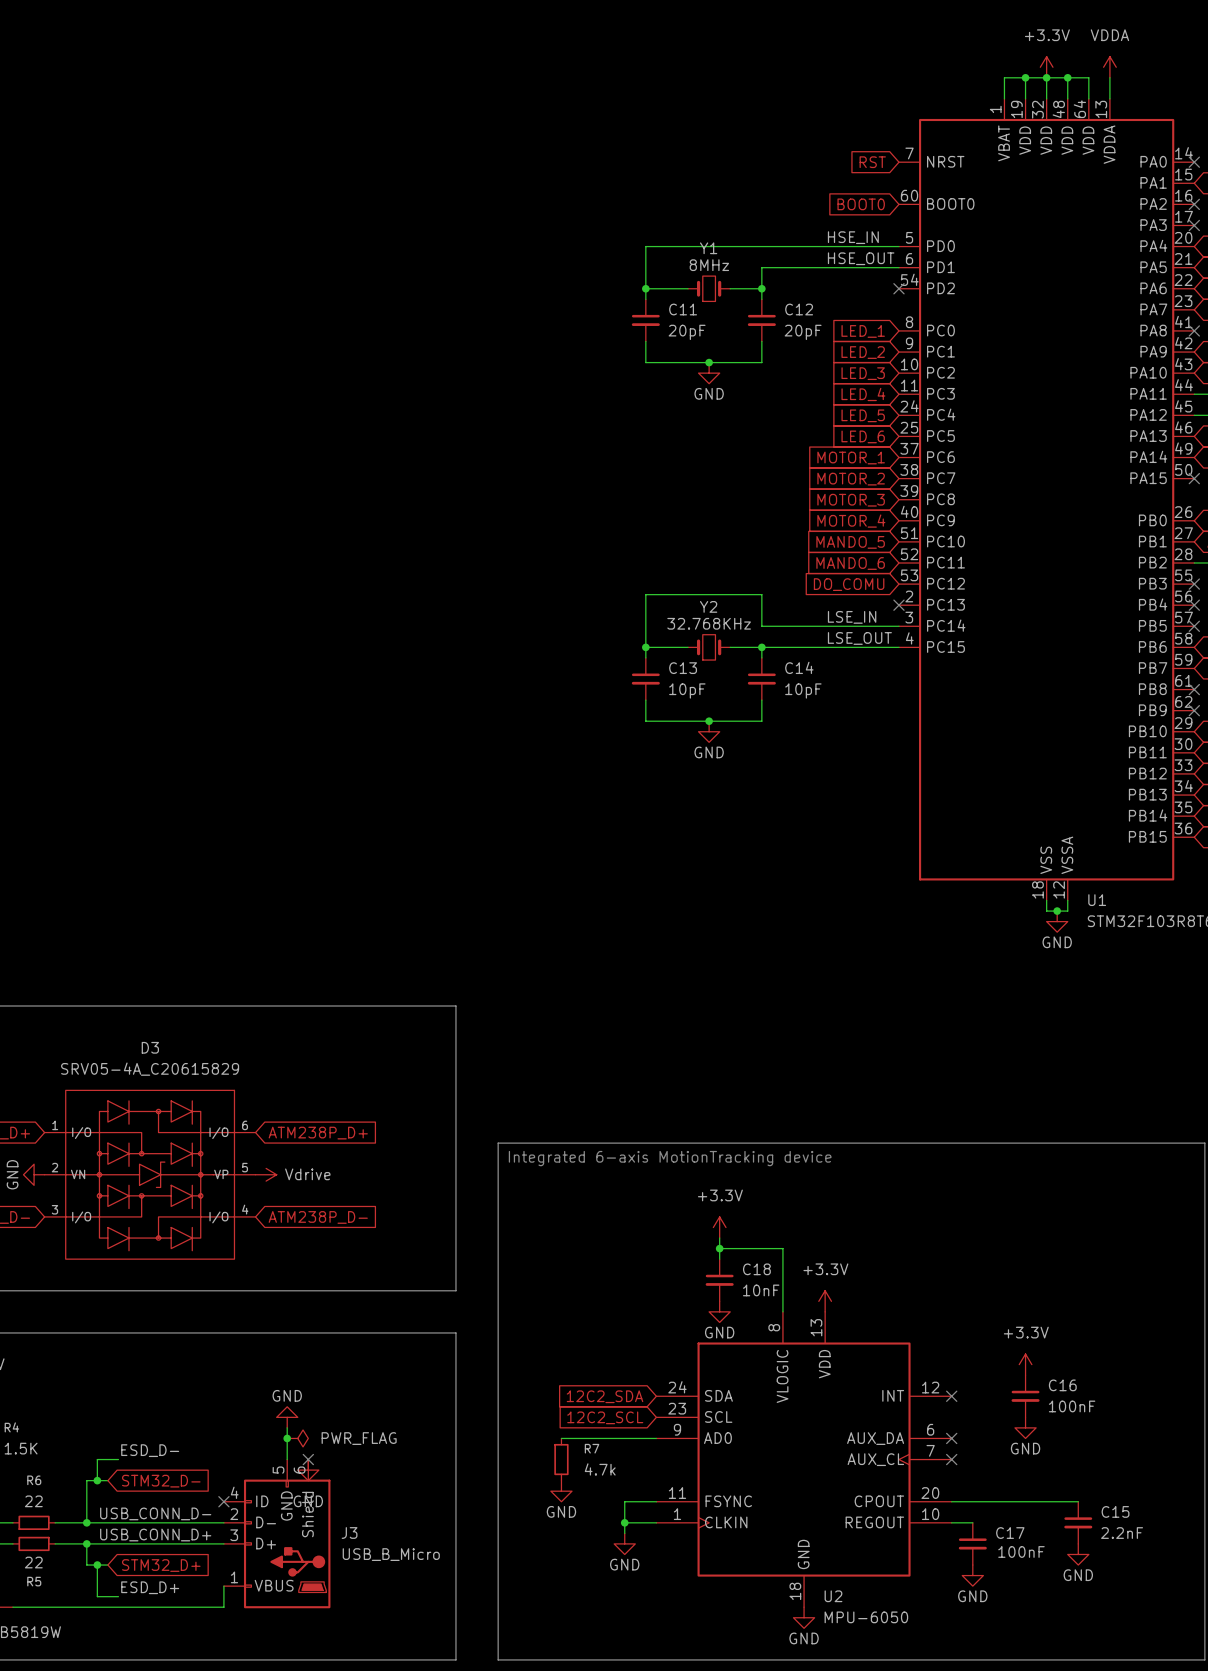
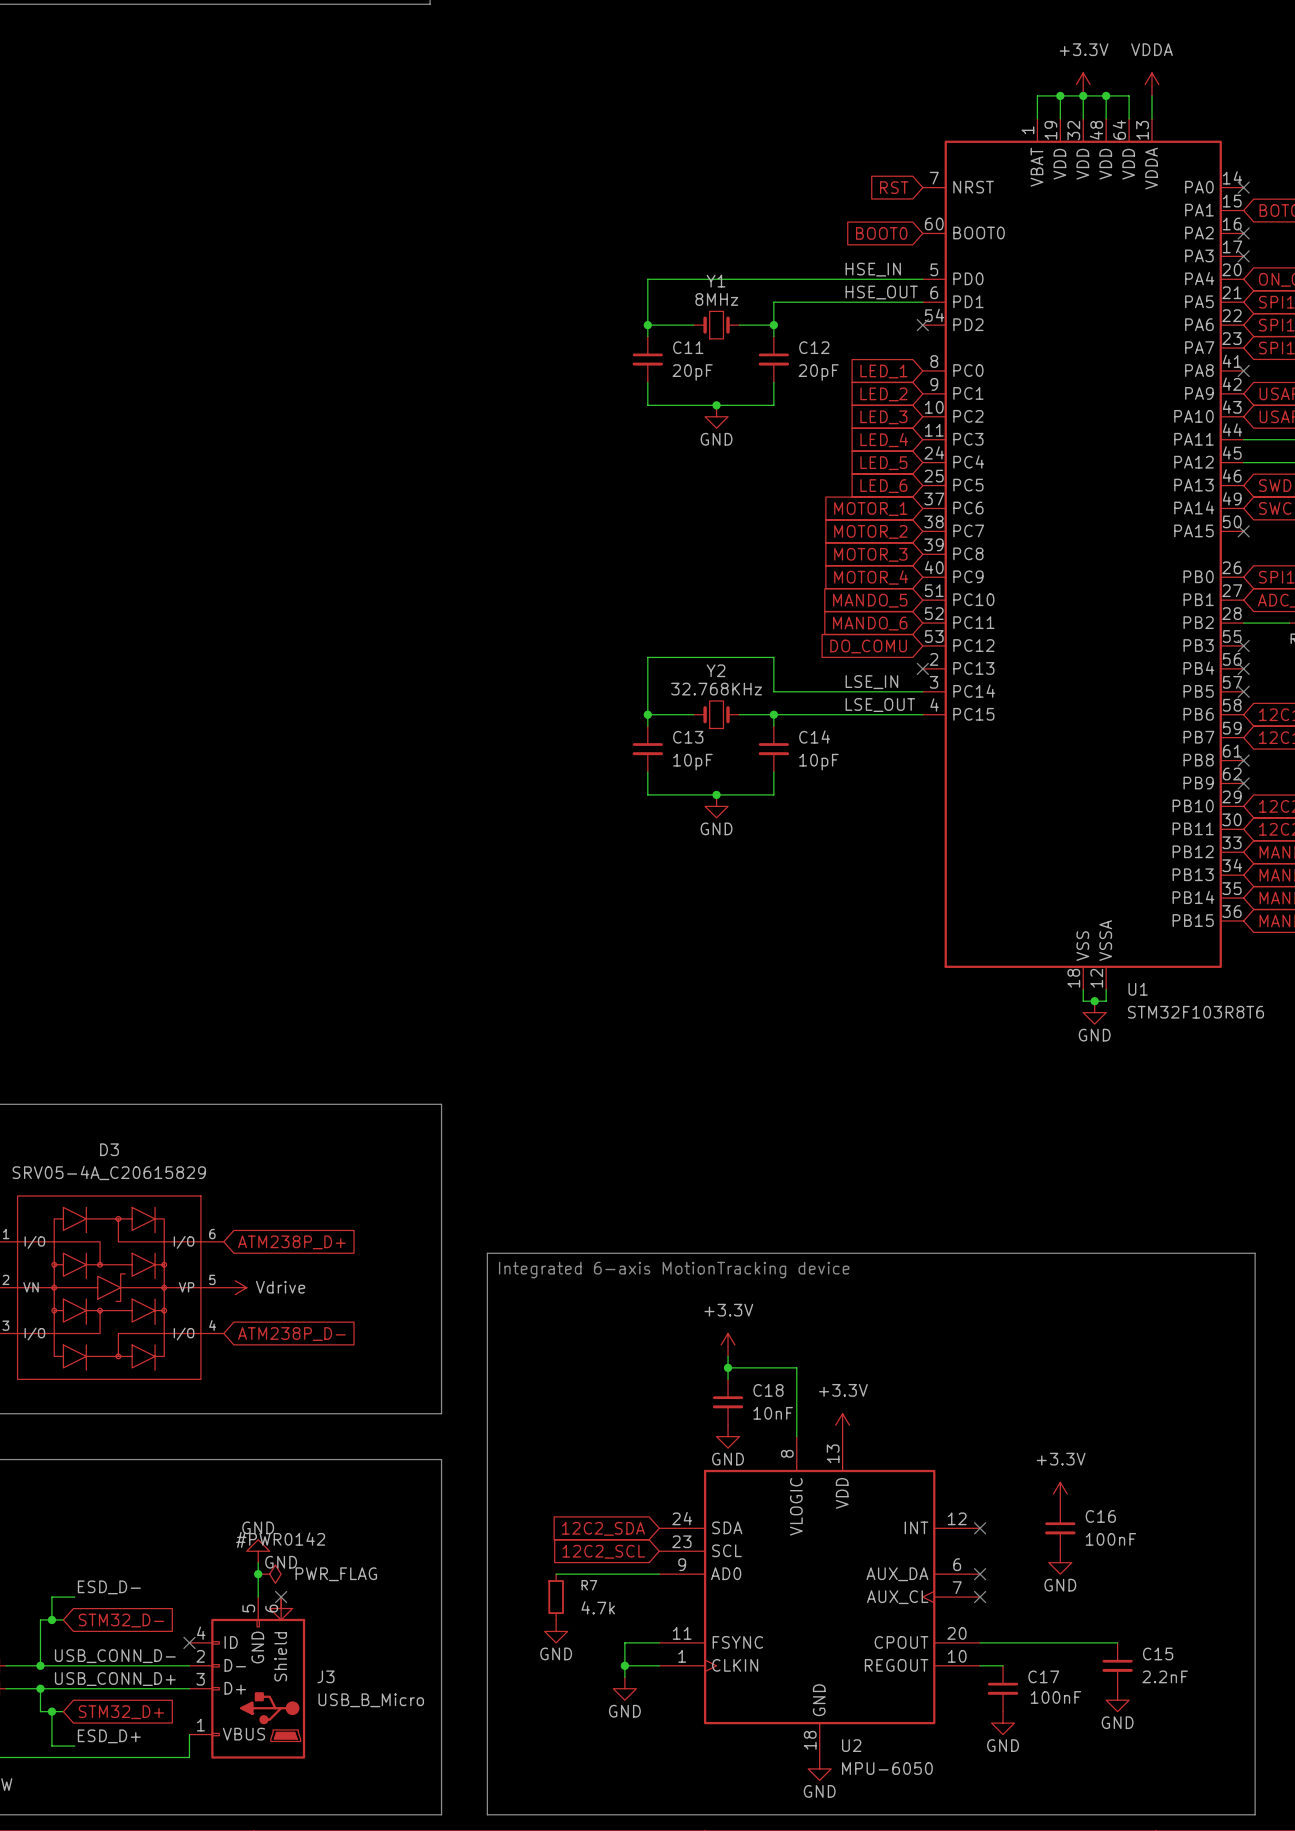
#PWR0142 name: none -> #PWR0142 (280, 1539)
#PWR0142 text position: GND (308, 1501) -> GND (281, 1562)

